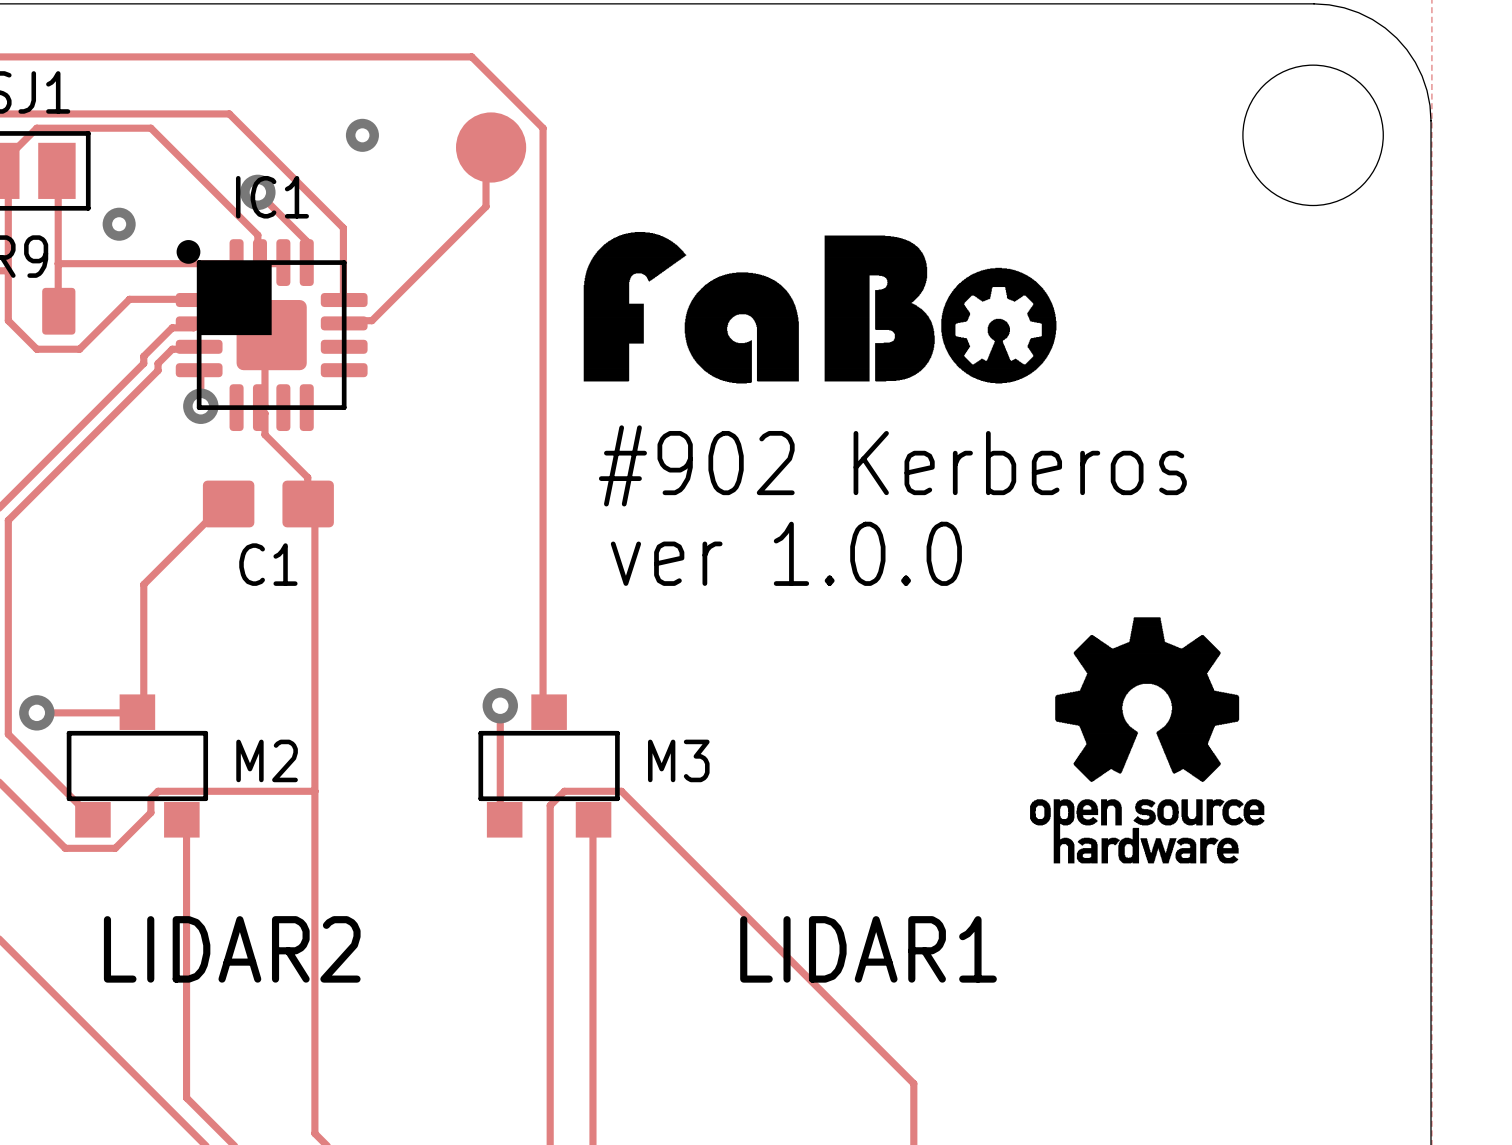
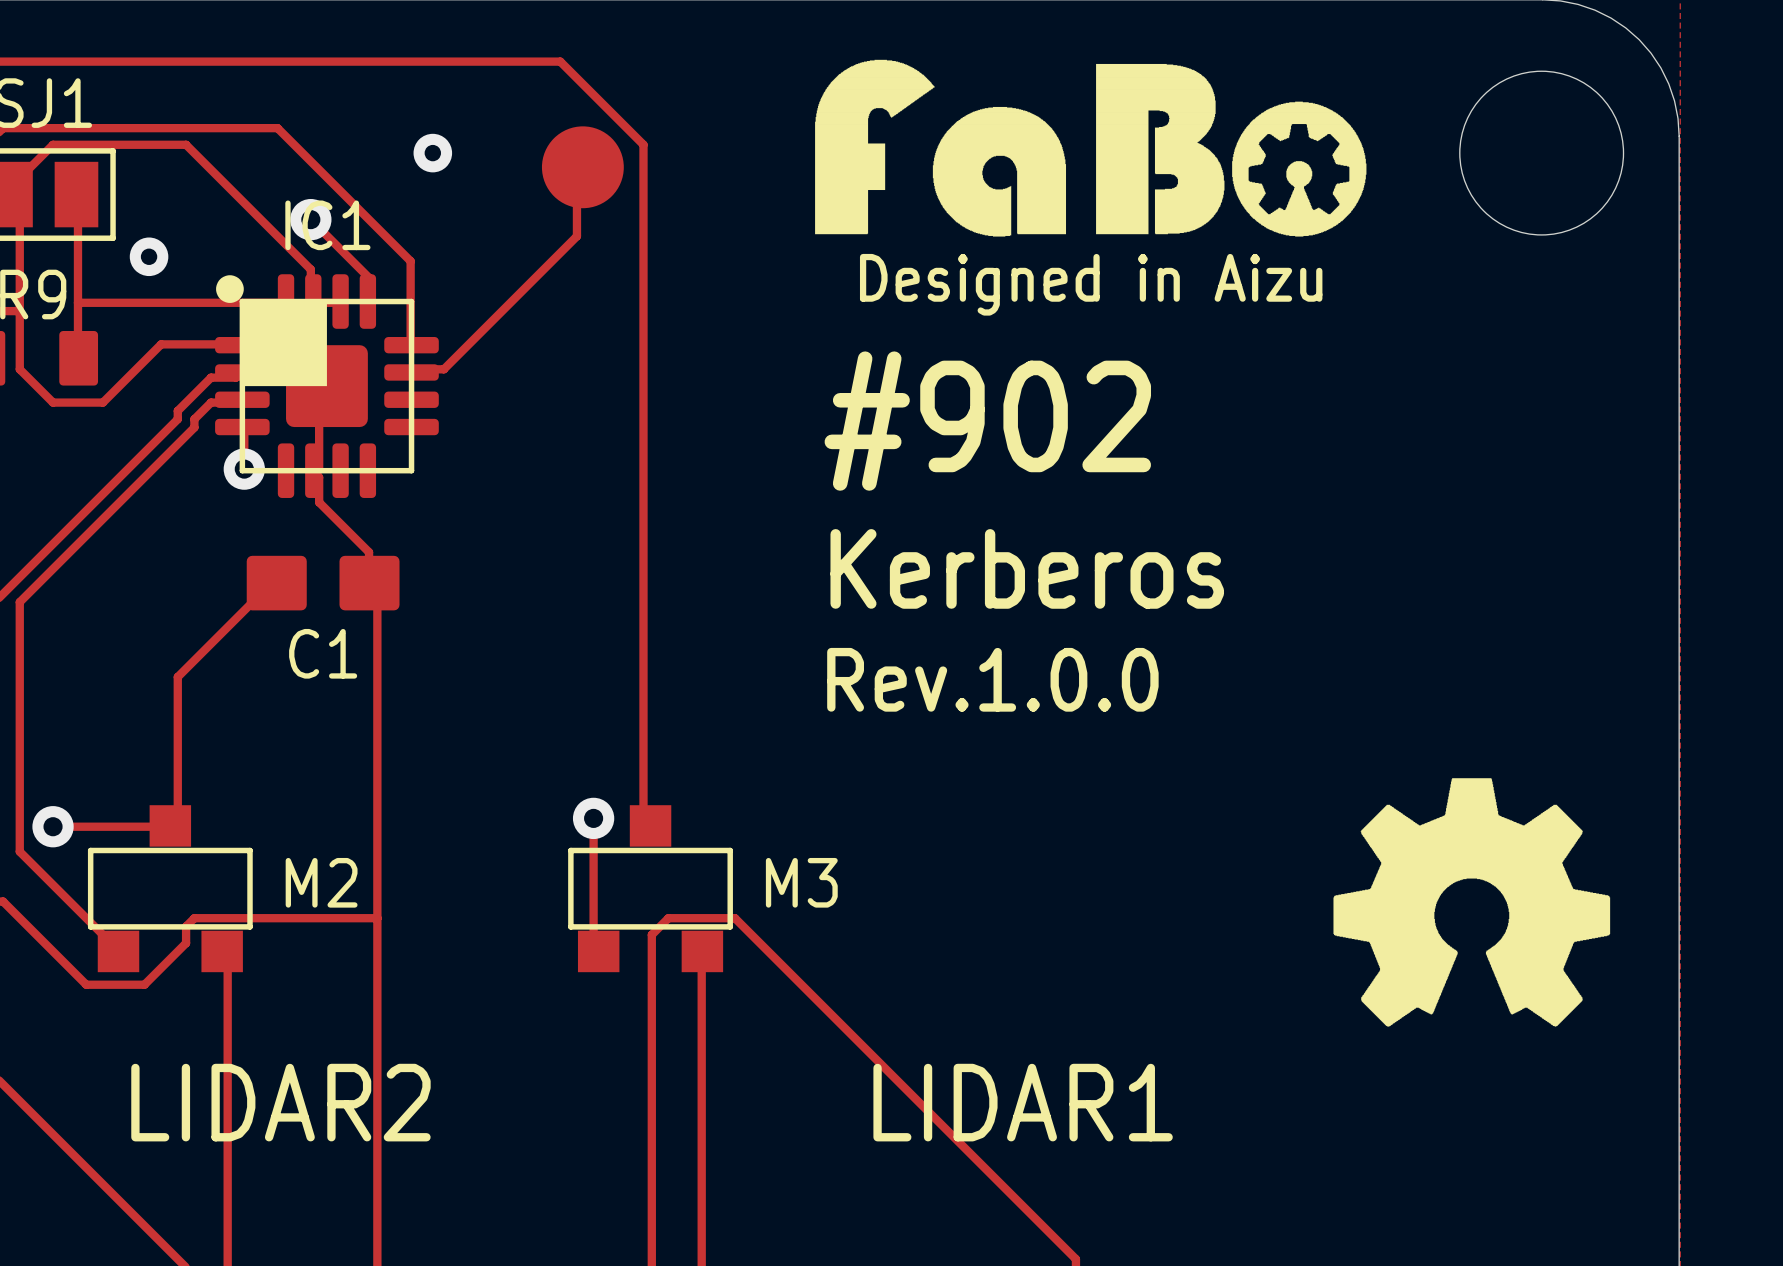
text: none -> Designed in Aizu (1091, 284)
drawing position: (820, 307) -> (1090, 148)
text: none -> #902 (987, 421)
text: #902 Kerberos (892, 465) -> Kerberos (1027, 568)
text: ver 1.0.0 (786, 553) -> Rev.1.0.0 (992, 679)
drawing: [1030, 617, 1265, 864] -> none
drawing: none -> [1333, 778, 1611, 1027]

